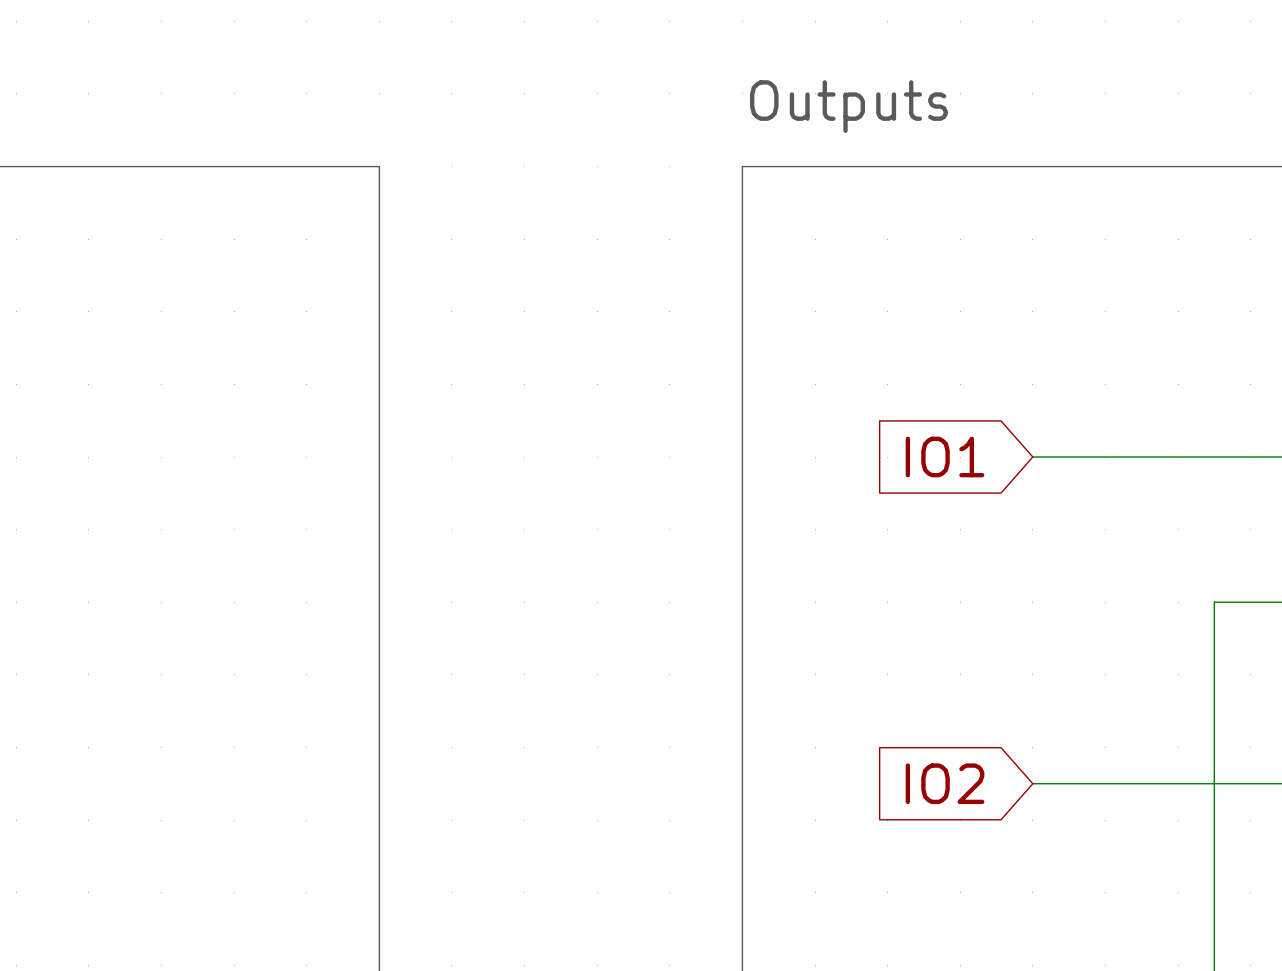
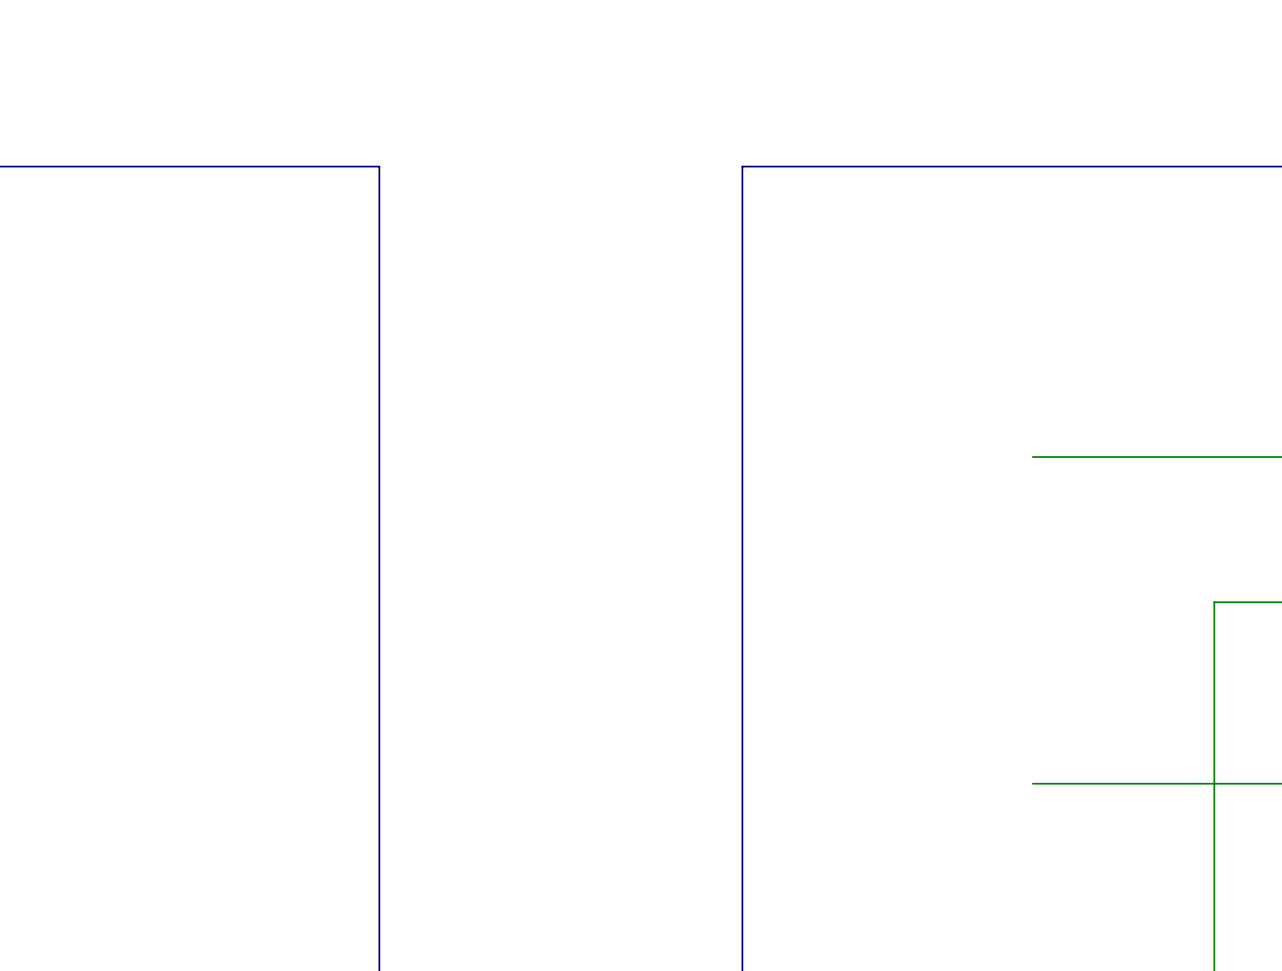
text: Outputs (848, 106) -> none
global label: IO1 (945, 457) -> none
global label: IO2 (945, 783) -> none

